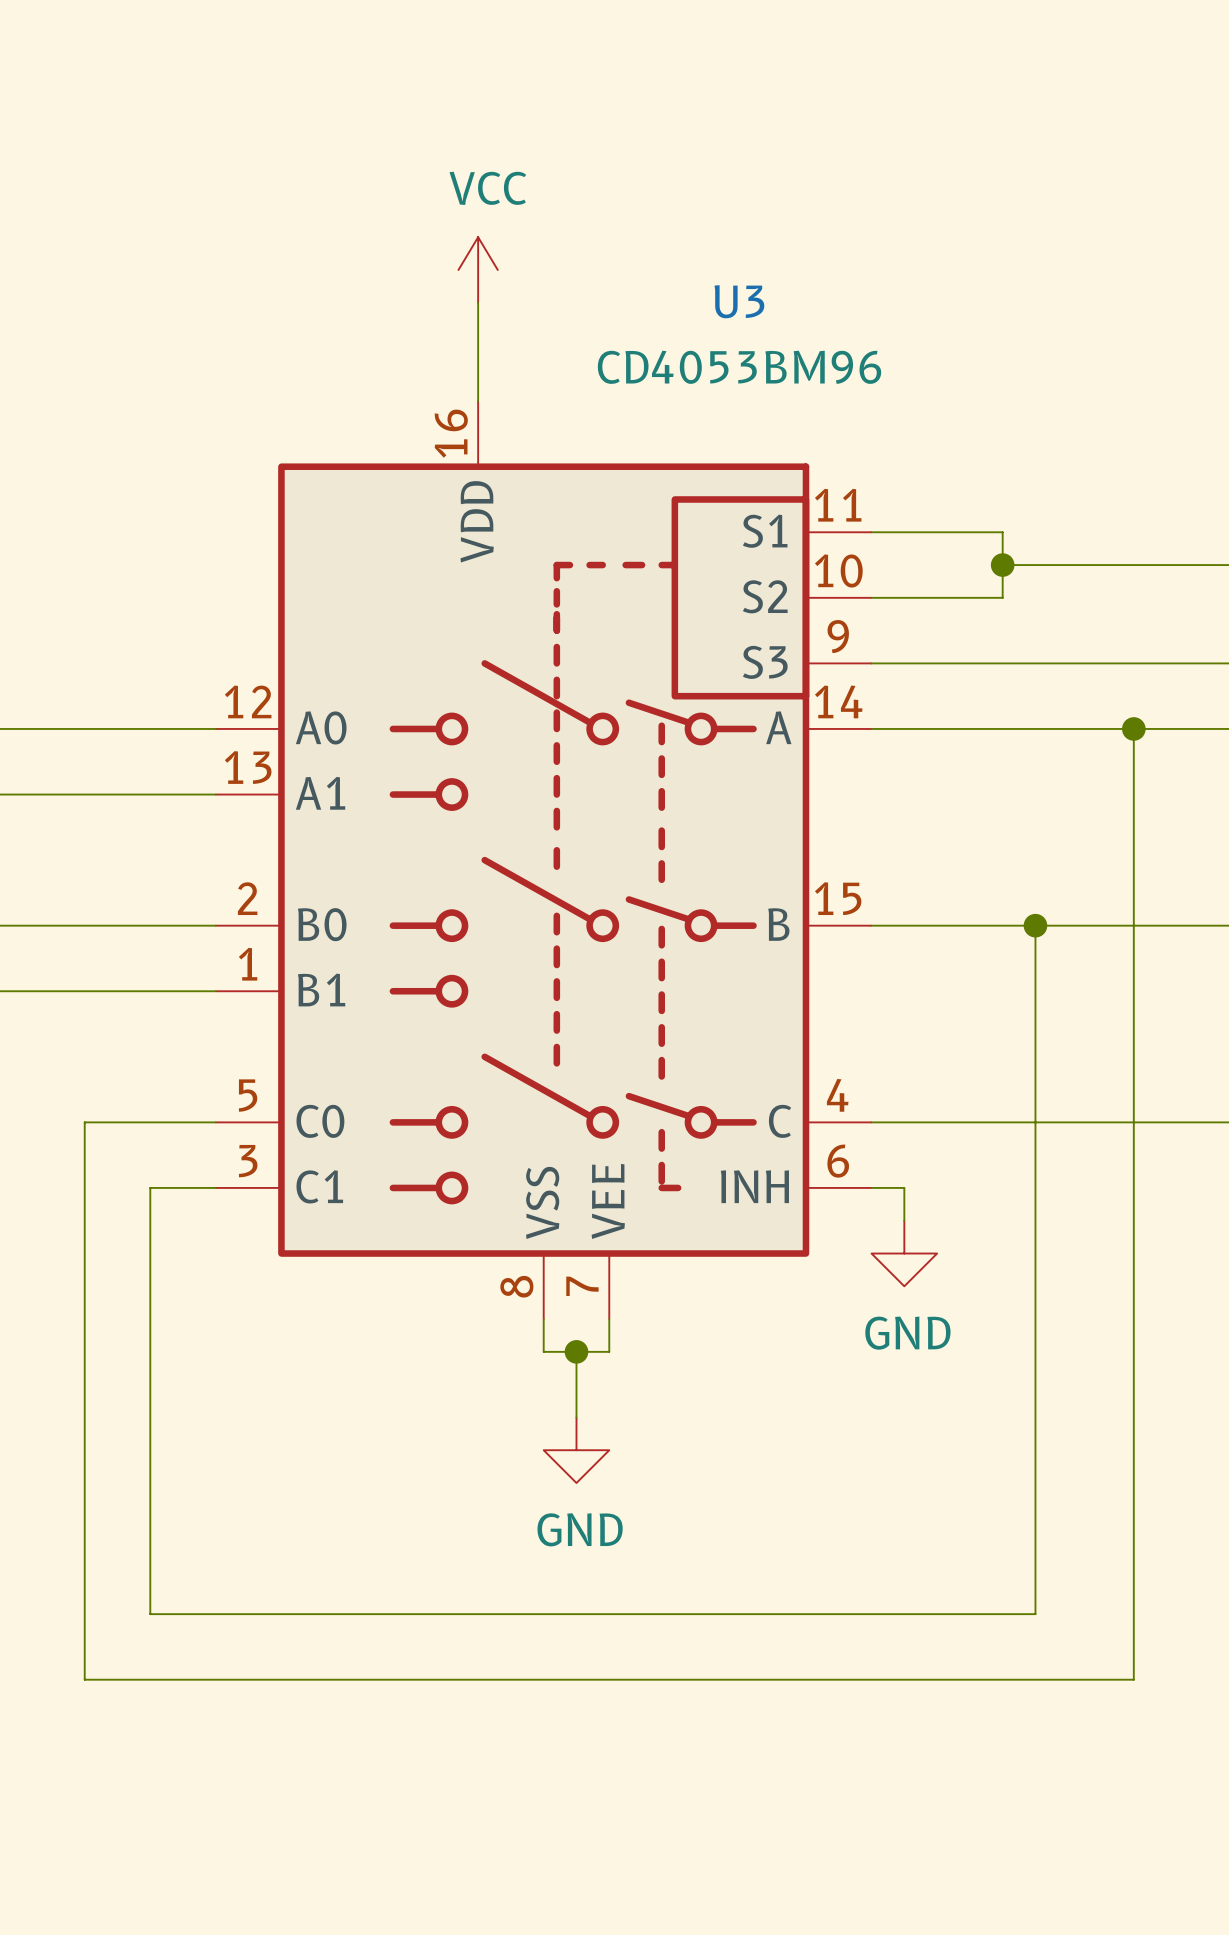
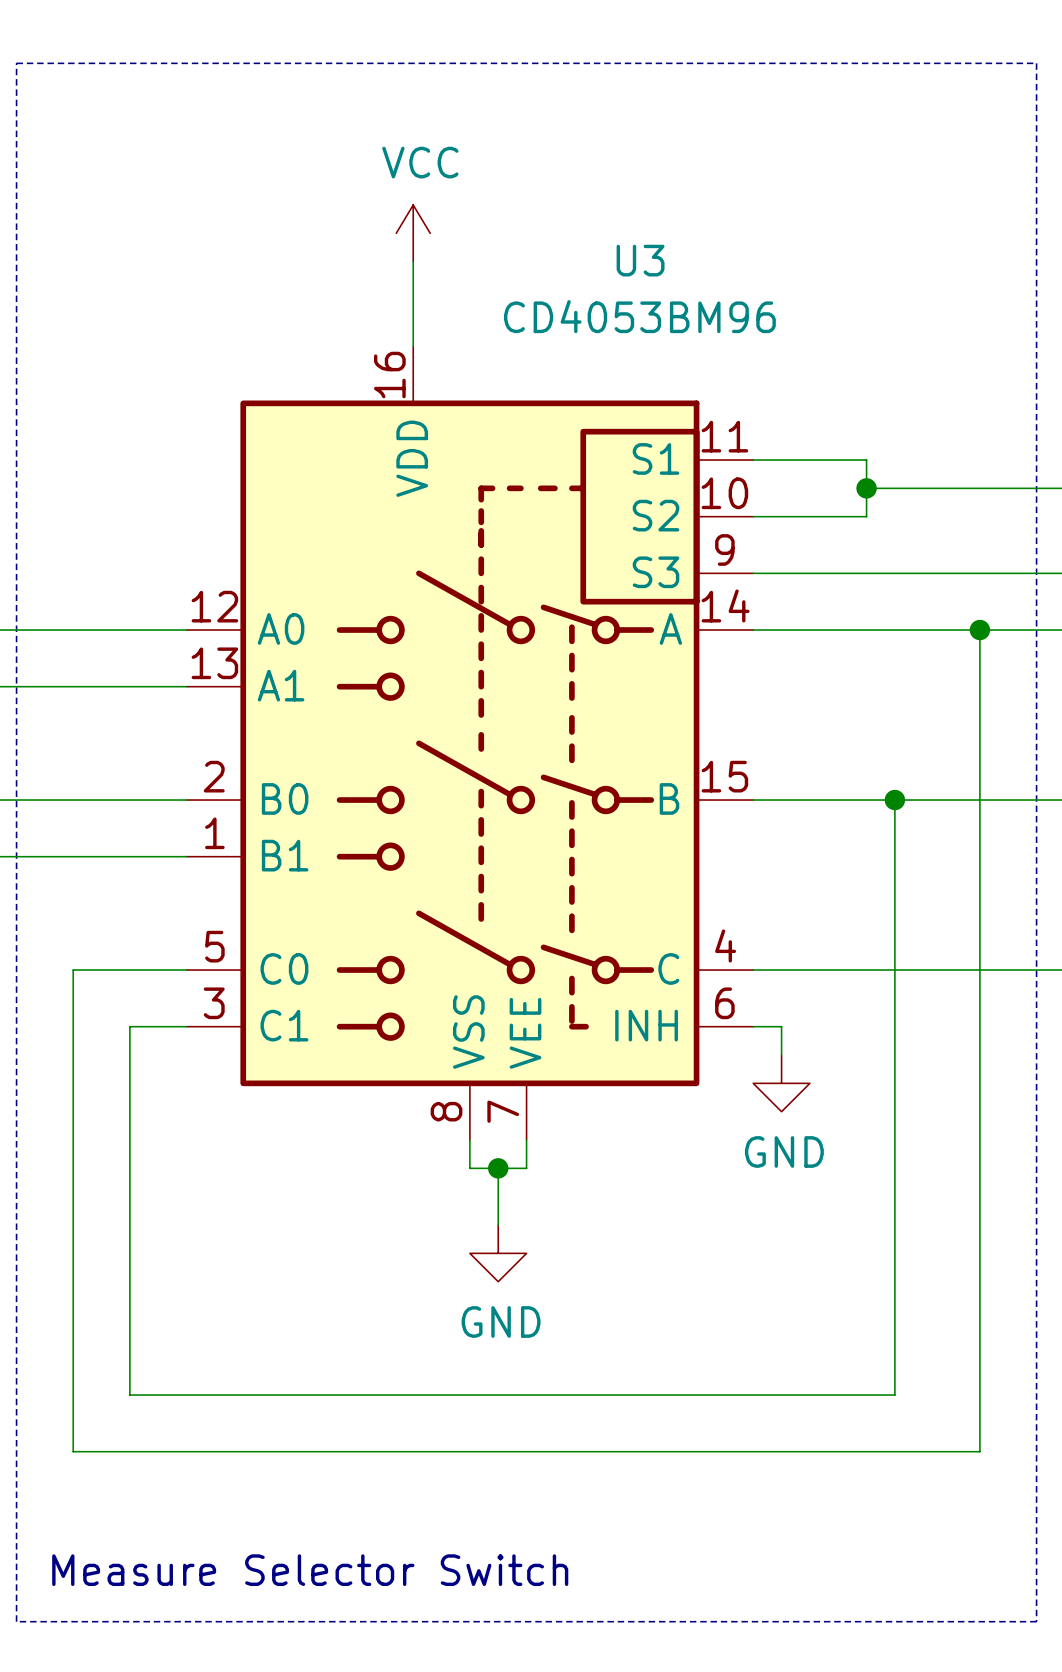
line: none -> (16, 63) (16, 1621) (1036, 1621) (1036, 63) (16, 63)
text: none -> Measure Selector Switch (310, 1570)

